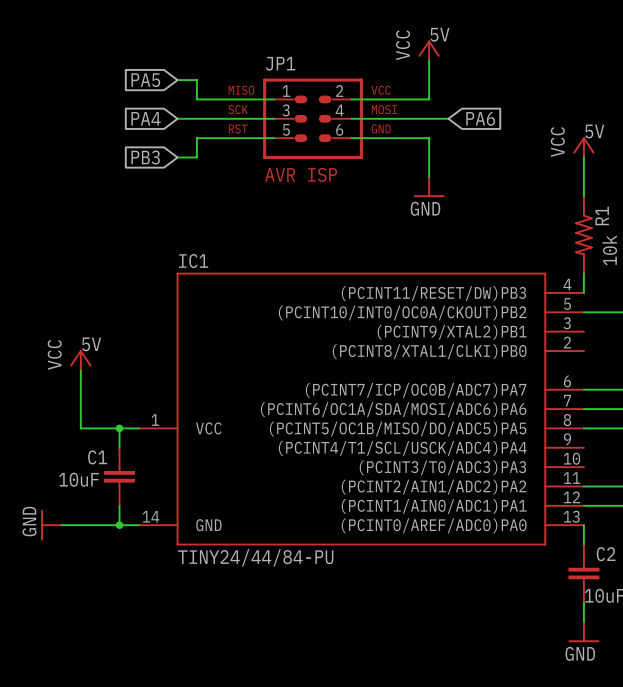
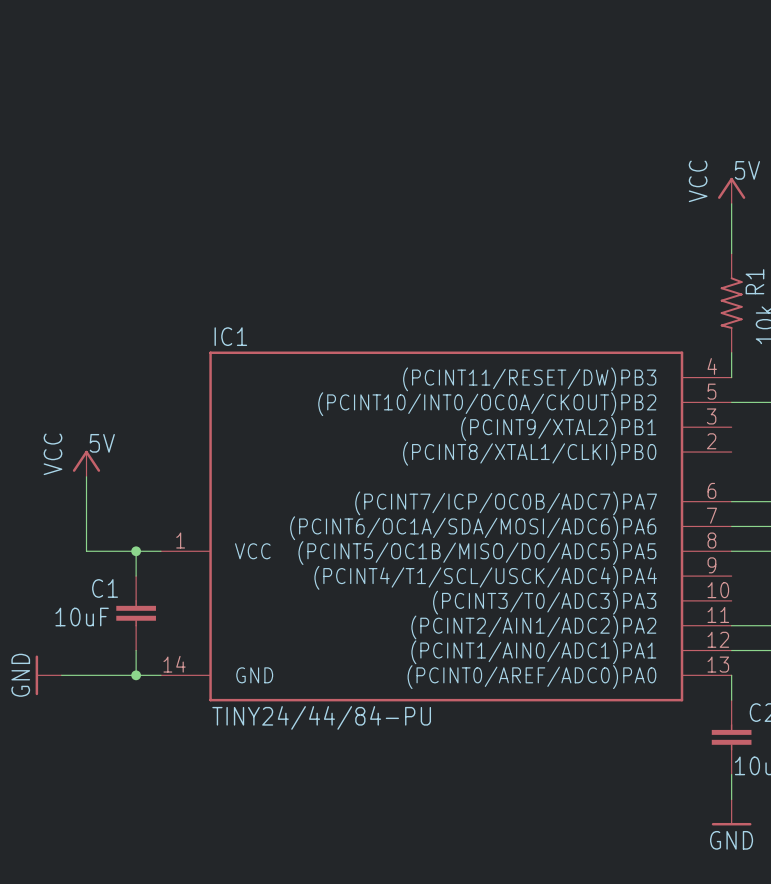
power symbol: VCC (429, 50) -> none
wire: (429, 60) (429, 99) (351, 99) -> none
global label: PA5 (145, 80) -> none
wire: (177, 80) (196, 80) (196, 99) (274, 99) -> none
global label: PA4 (146, 118) -> none
wire: (177, 118) (274, 118) -> none
JP1: (313, 118) -> none
wire: (351, 118) (448, 118) -> none
global label: PA6 (480, 118) -> none
wire: (274, 138) (196, 138) (196, 157) (177, 157) -> none
wire: (351, 138) (429, 138) (429, 176) -> none
global label: PB3 (145, 157) -> none
power symbol: GND (429, 187) -> none

